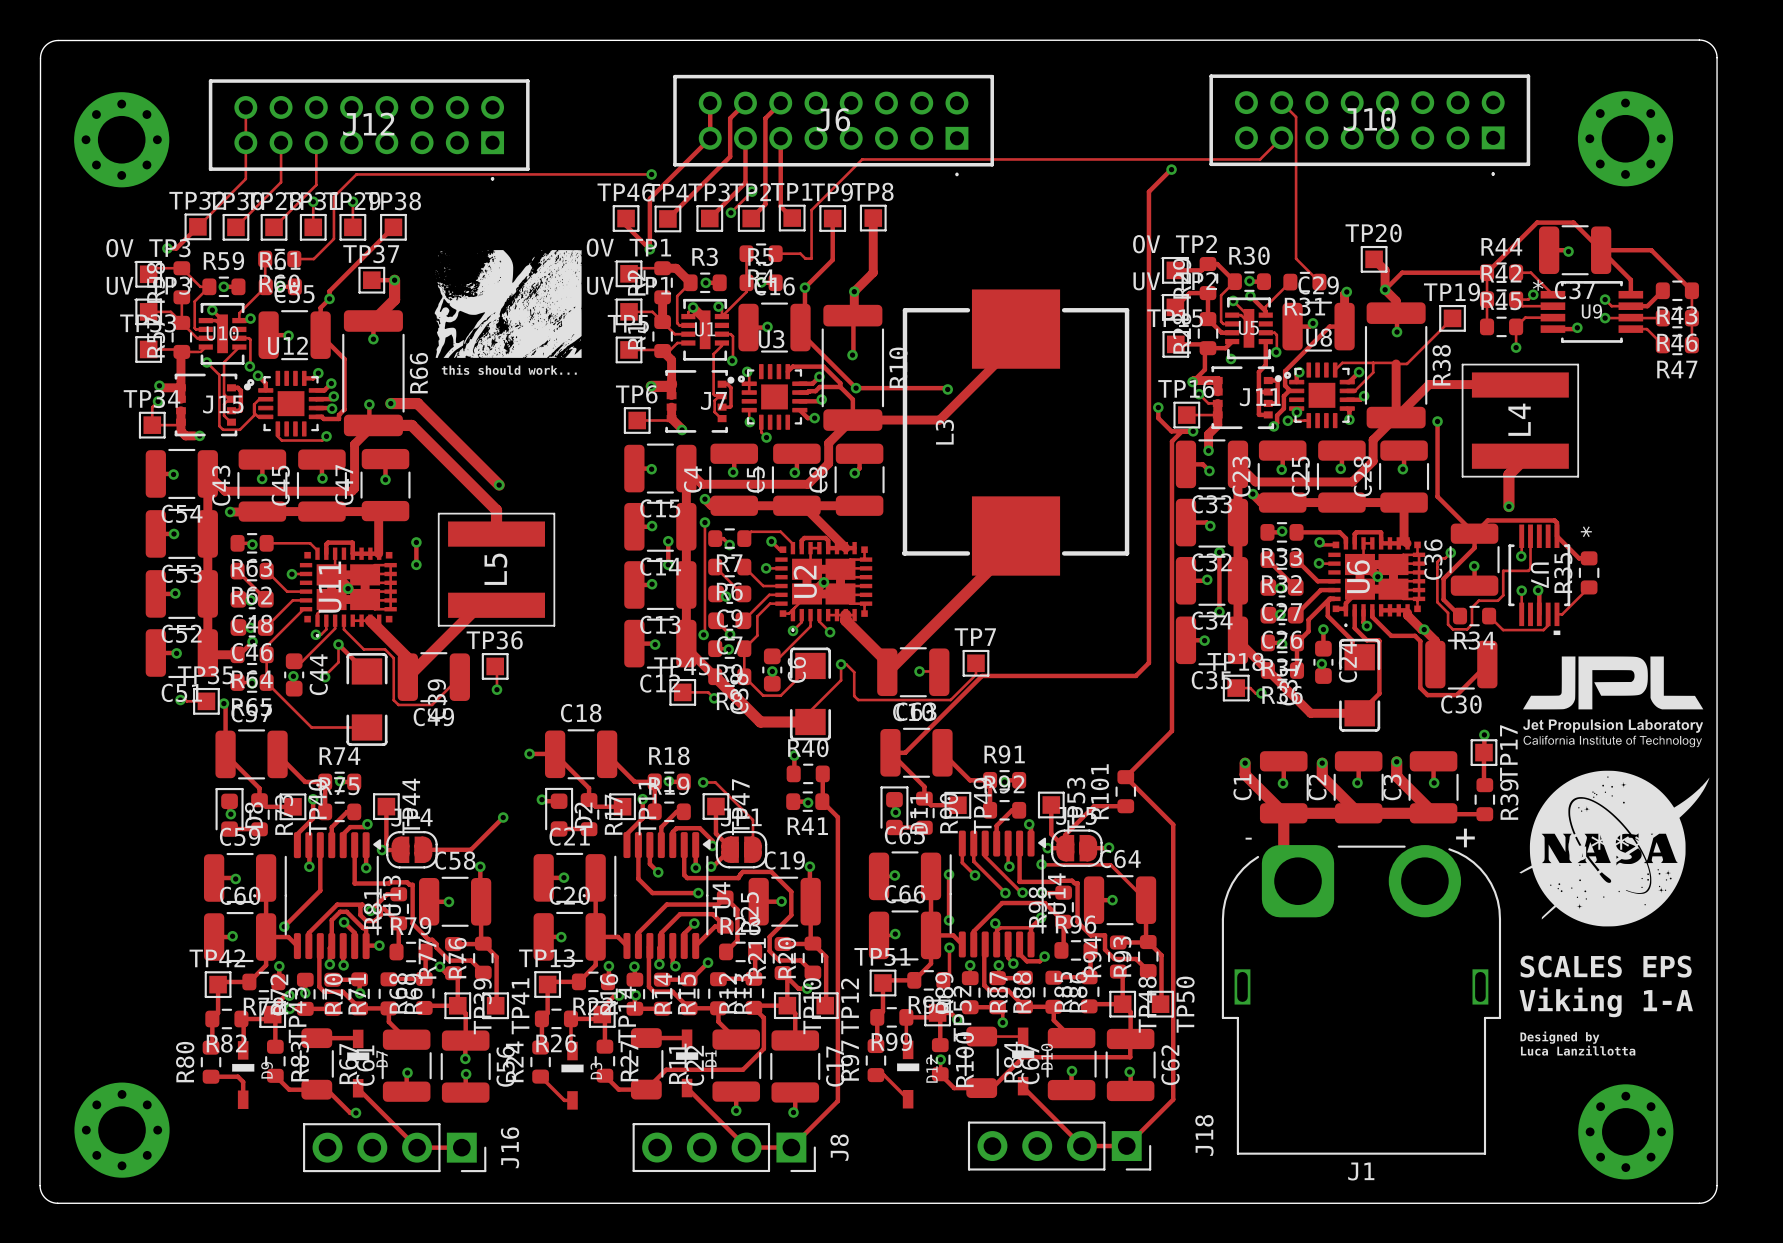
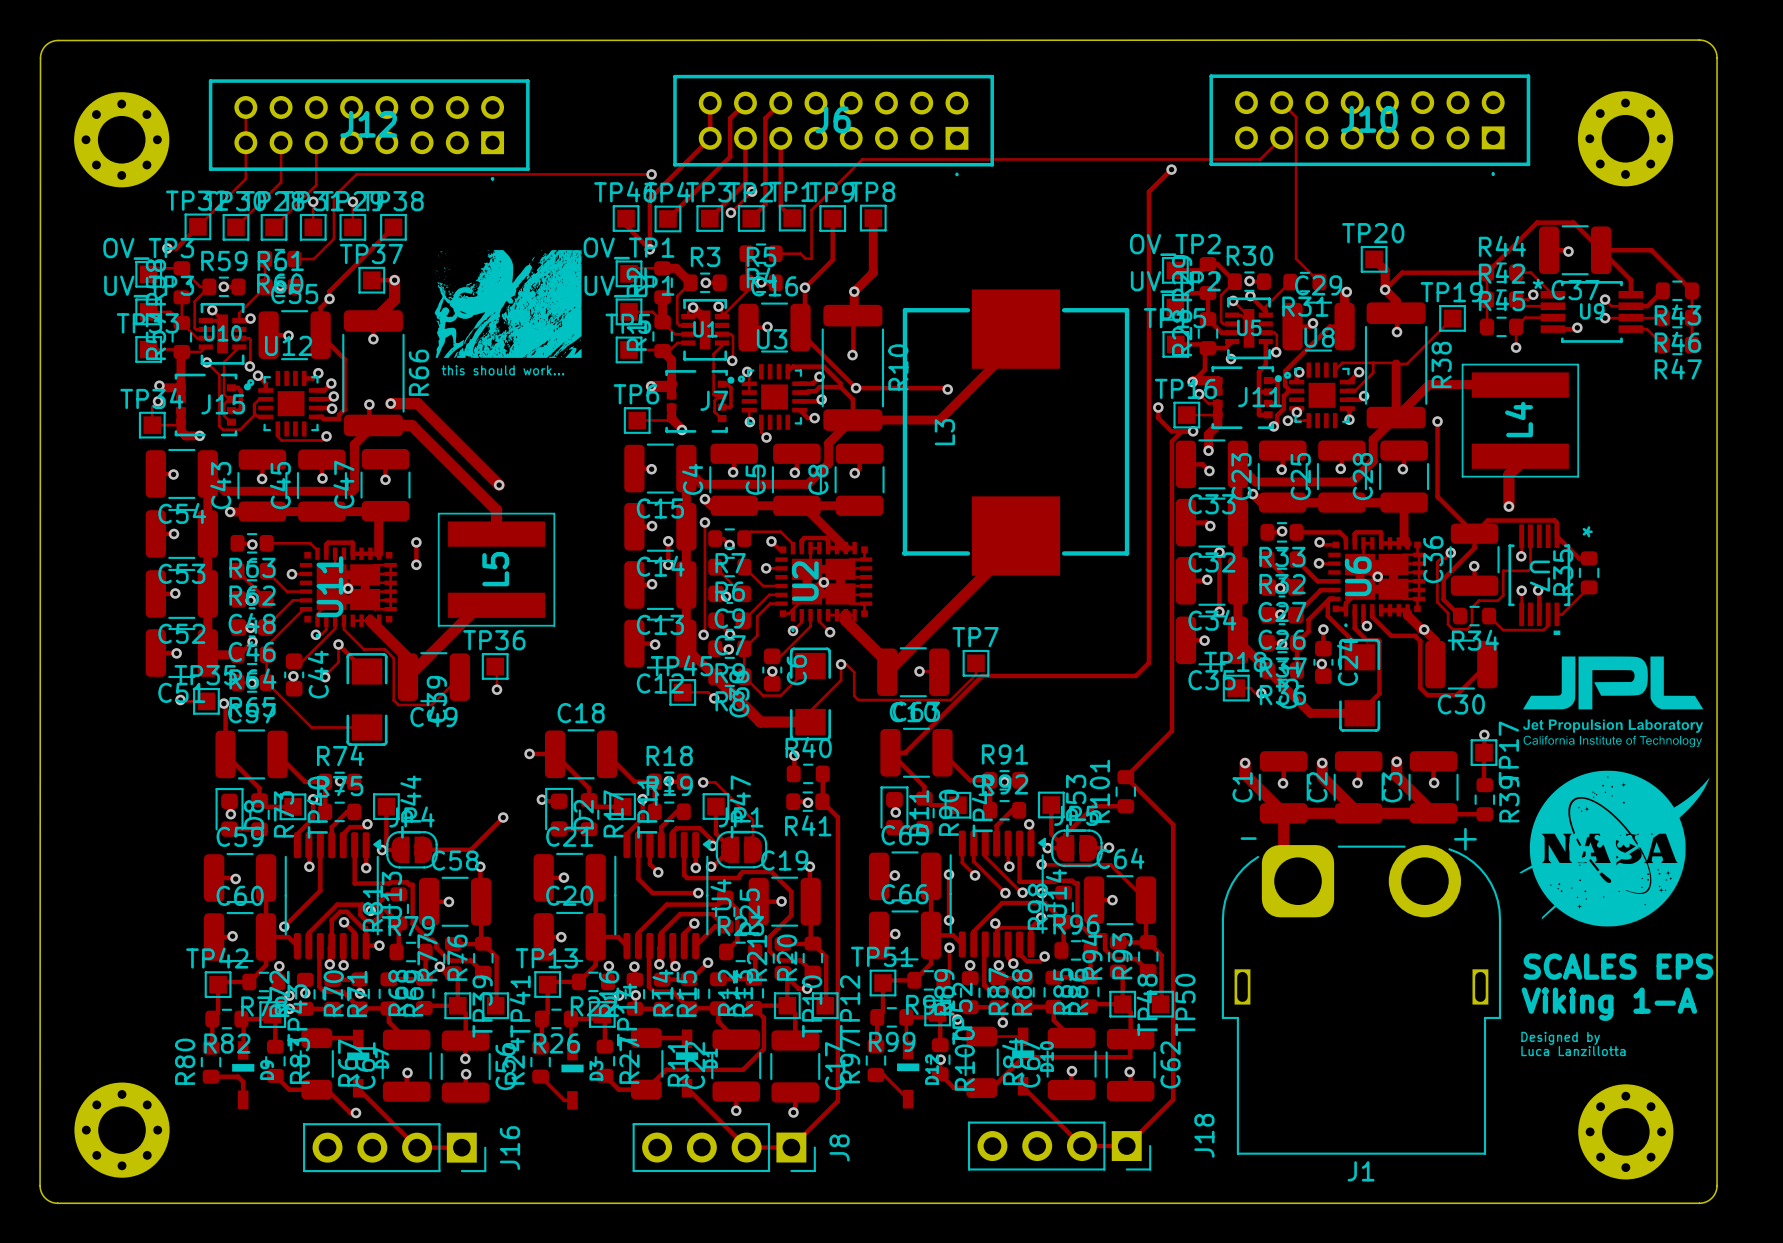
drawing: [434, 250, 582, 358] -> none
part: none -> (508, 303)

